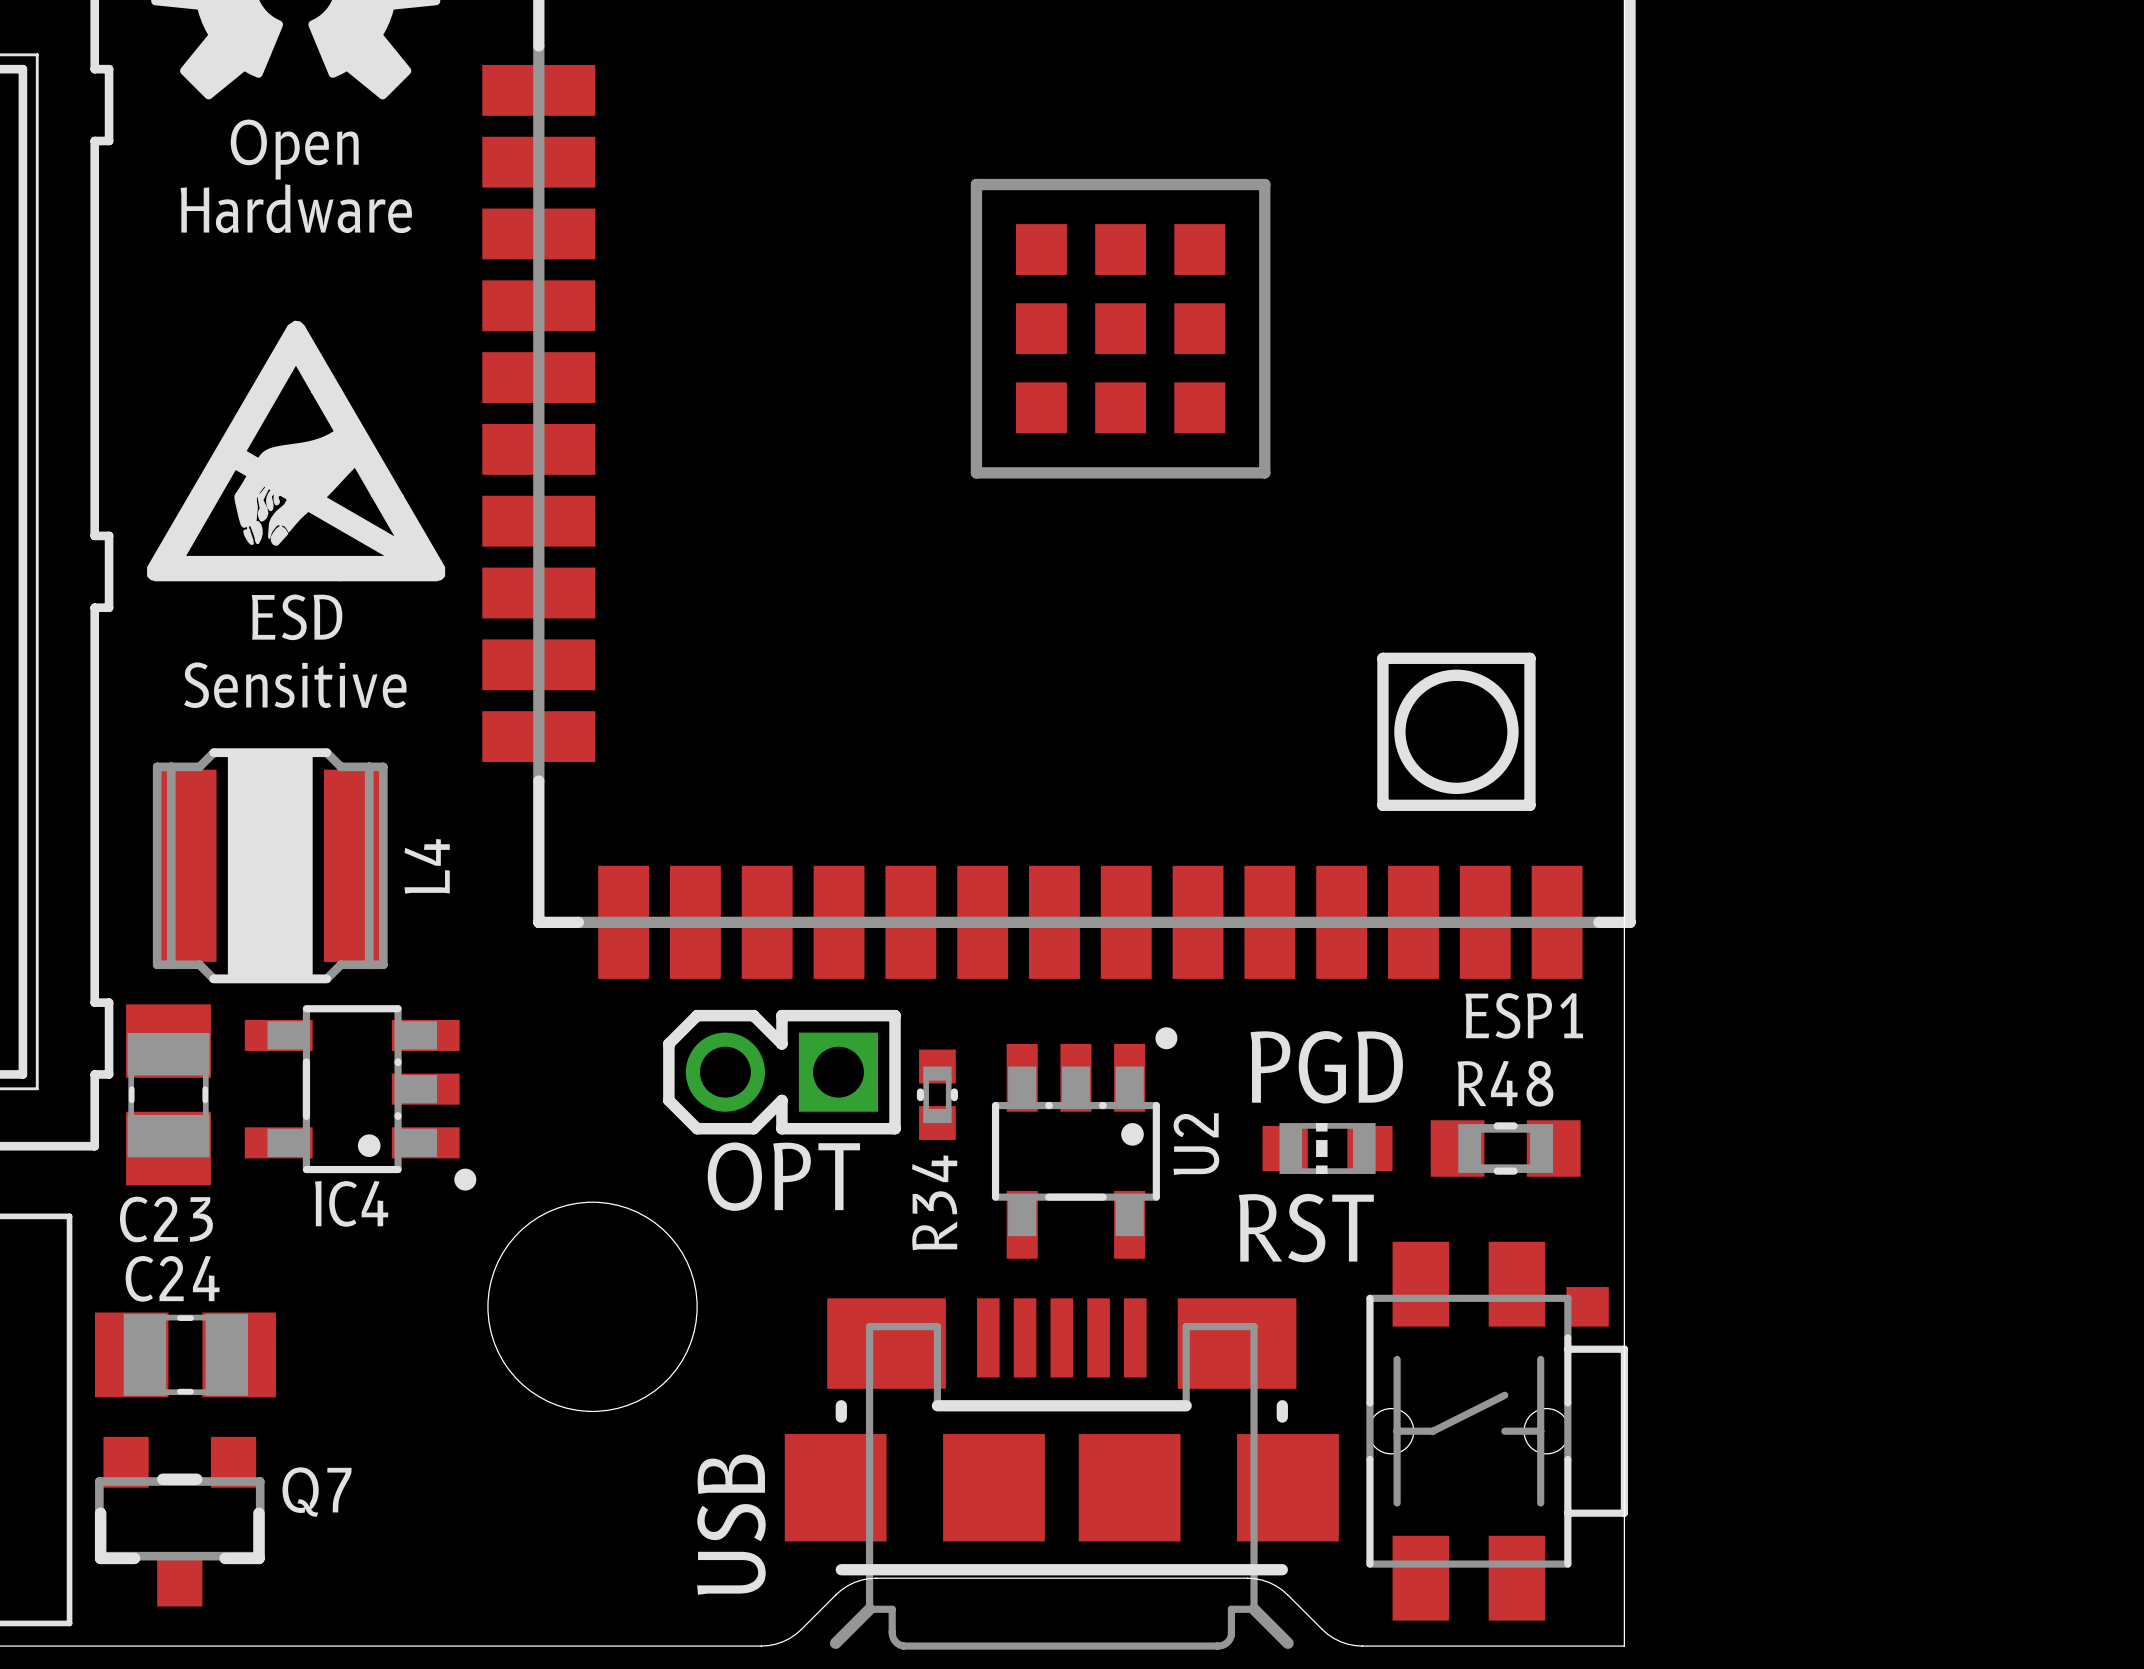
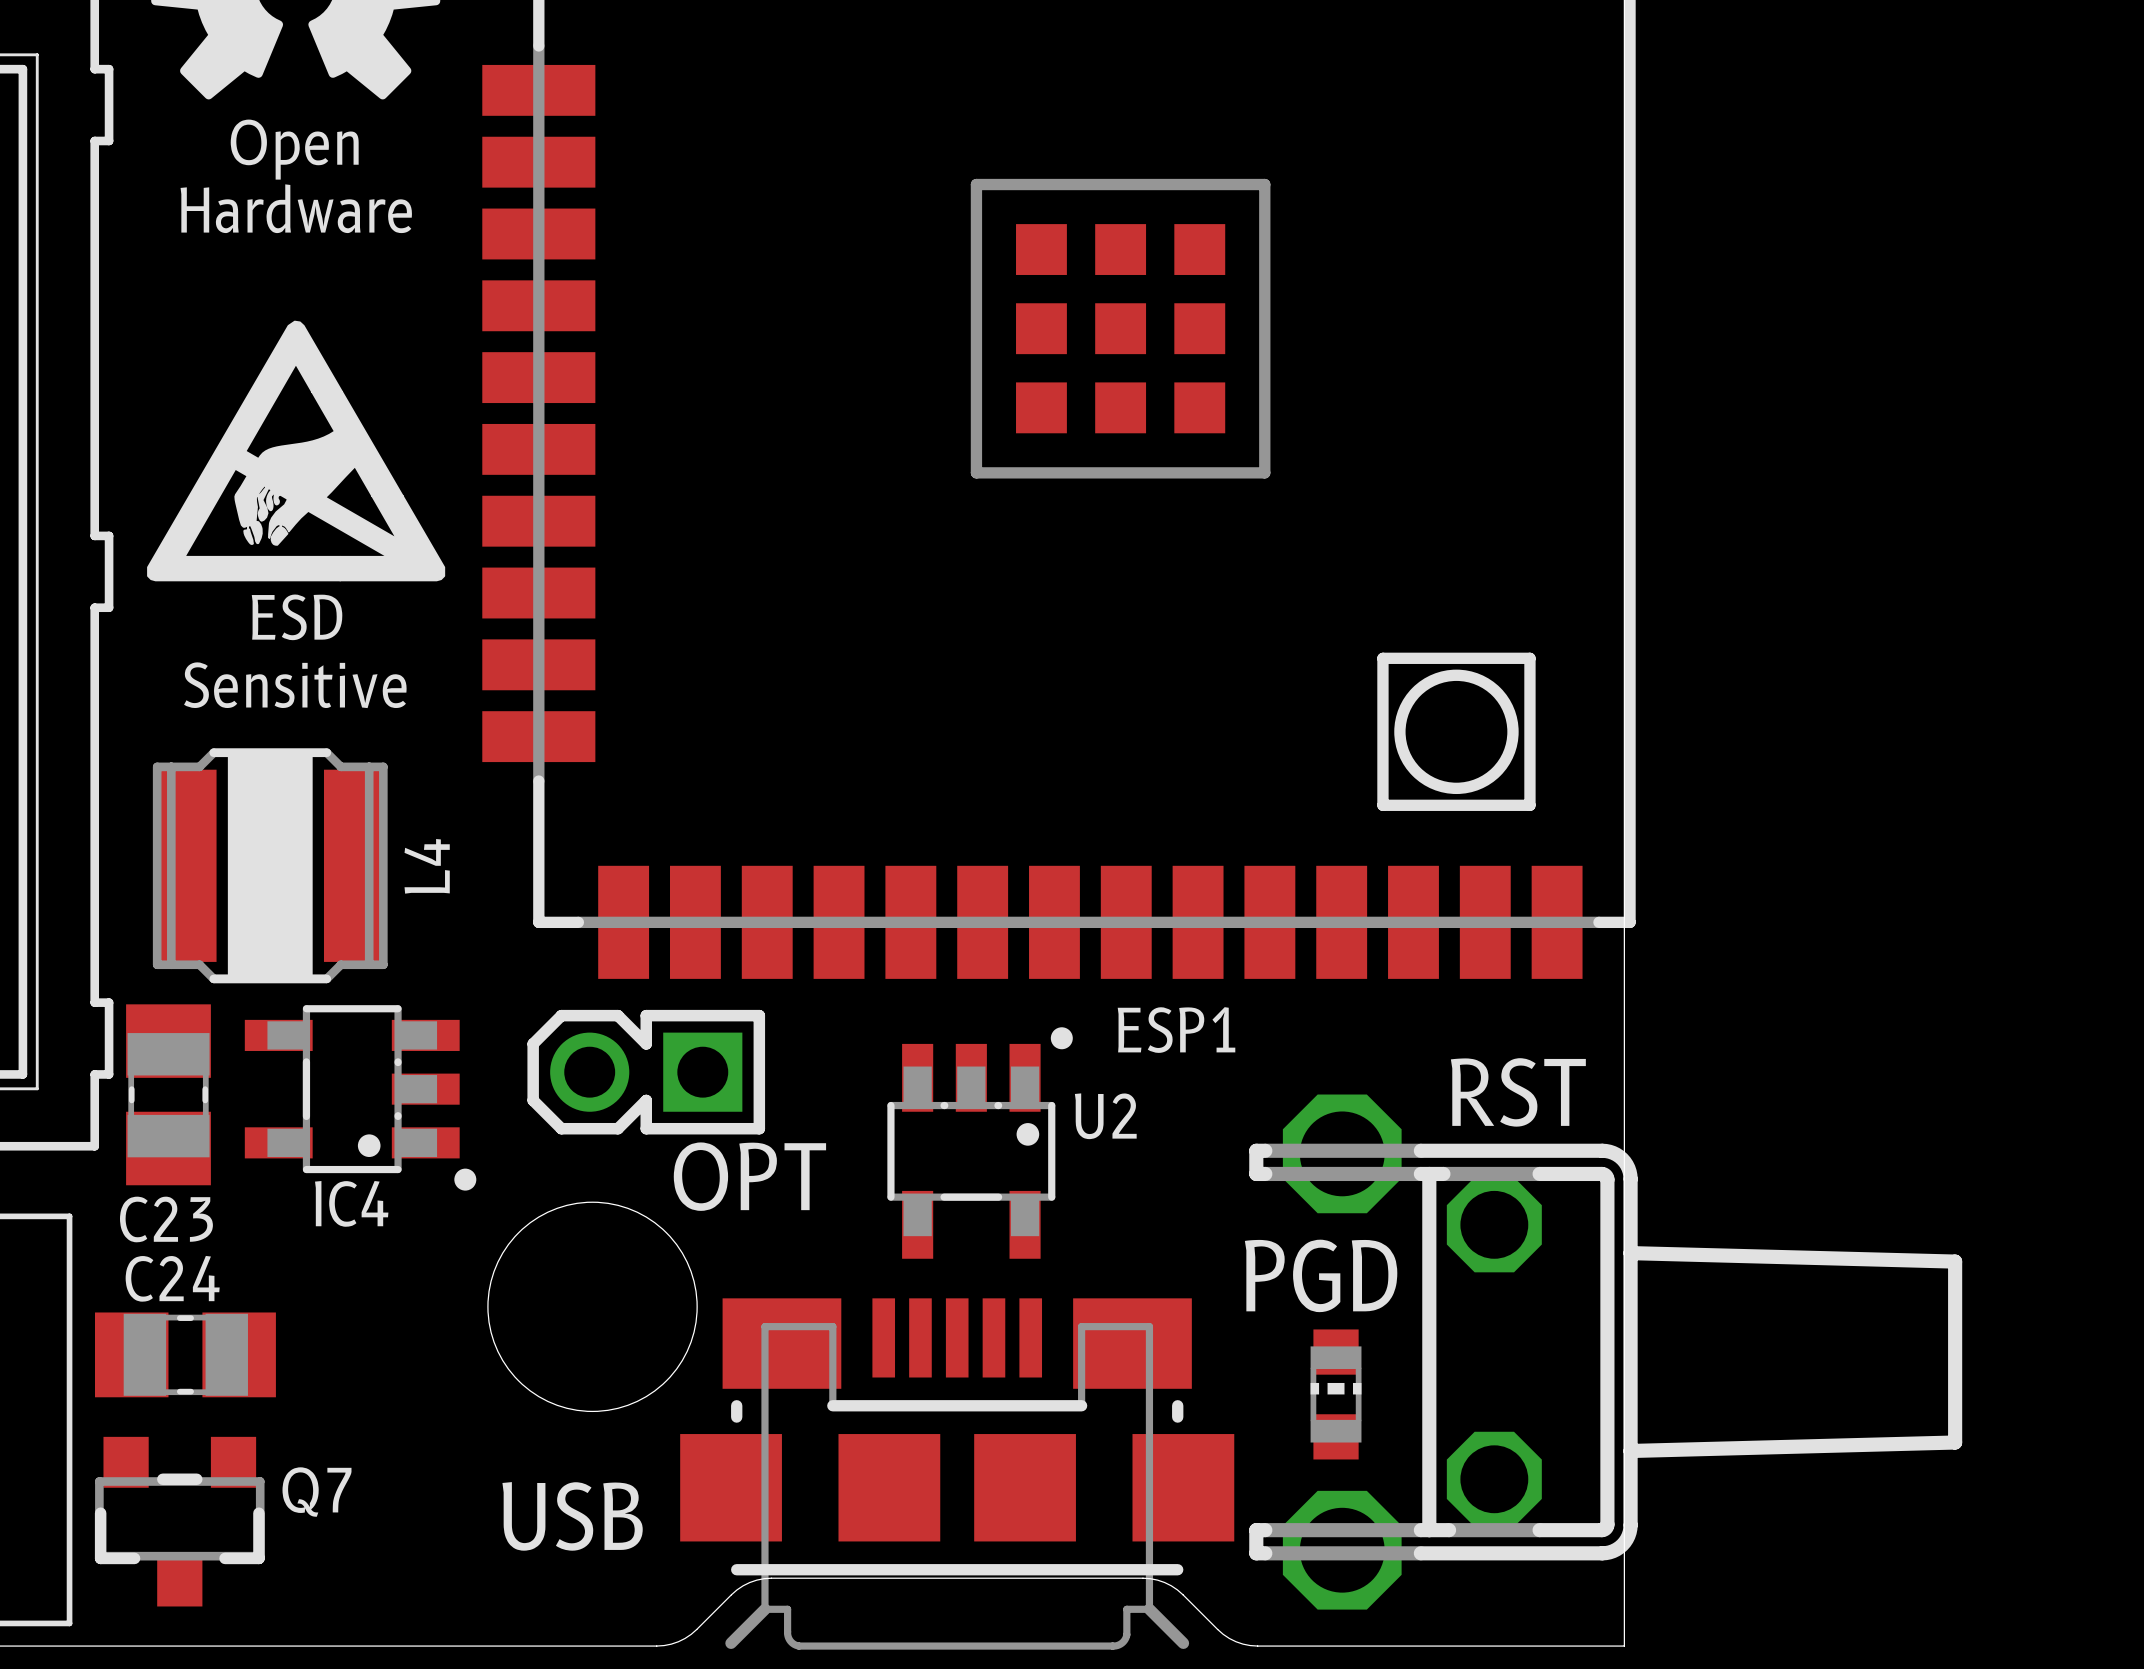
ESP1 name position: ESP1 (1524, 1015) -> ESP1 (1176, 1030)
OPT position: (781, 1072) -> (646, 1072)
R34: (937, 1094) -> none
U2 position: (1084, 1143) -> (980, 1143)
U2 name rotation: 0° (1196, 1144) -> 90° clockwise (1105, 1116)
PGD rotation: 0° (1327, 1148) -> 90° clockwise (1336, 1394)
PGD position: (1327, 1148) -> (1336, 1394)
R48: (1505, 1148) -> none
OPT name position: OPT (783, 1176) -> OPT (749, 1176)
RST: none -> (1605, 1352)
RST: (1497, 1431) -> none
USB position: (1061, 1473) -> (957, 1473)
USB name rotation: 0° (731, 1524) -> 90° clockwise (572, 1516)
board edge: (876, 1578) (861, 1580) (847, 1585) (795, 1634) (775, 1644) (761, 1646) (656, 1646) -> (876, 1578) (771, 1578) (756, 1580) (737, 1589) (685, 1638) (671, 1644) (656, 1646)
board edge: (1142, 1578) (1247, 1578) (1262, 1580) (1282, 1589) (1334, 1638) (1347, 1644) (1362, 1646) -> (1142, 1578) (1157, 1580) (1171, 1585) (1223, 1634) (1243, 1644) (1257, 1646) (1362, 1646)

